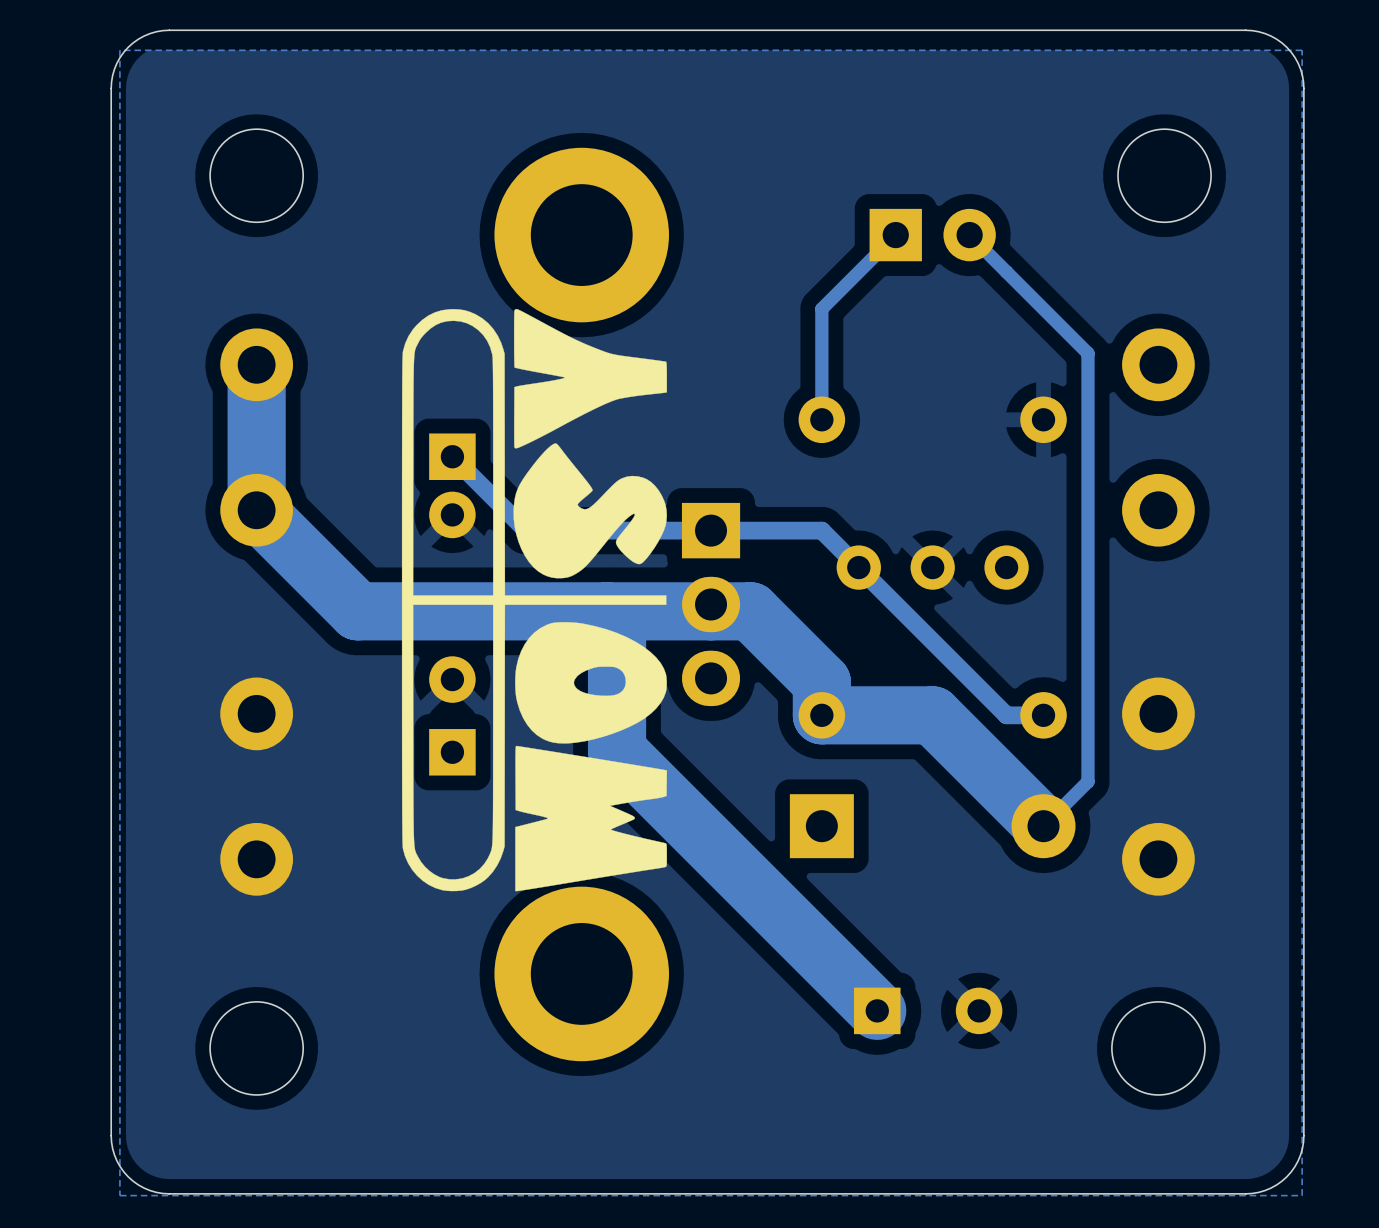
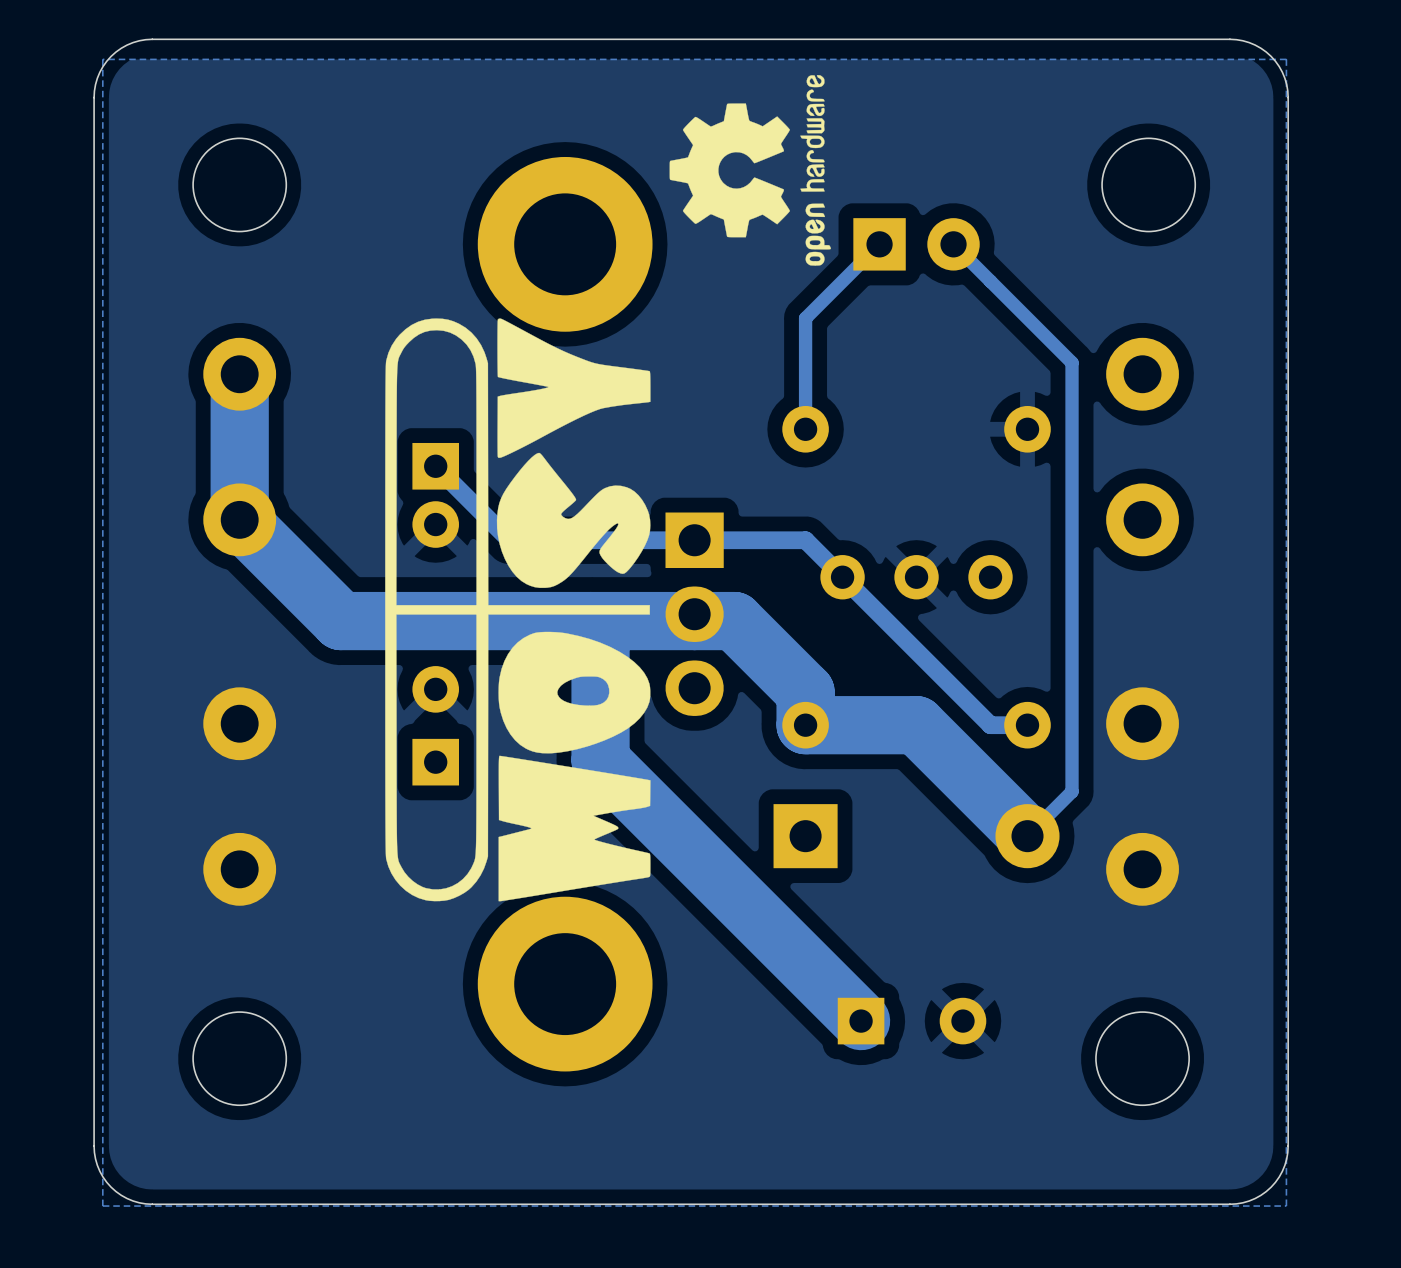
drawing: none -> [669, 75, 831, 266]

